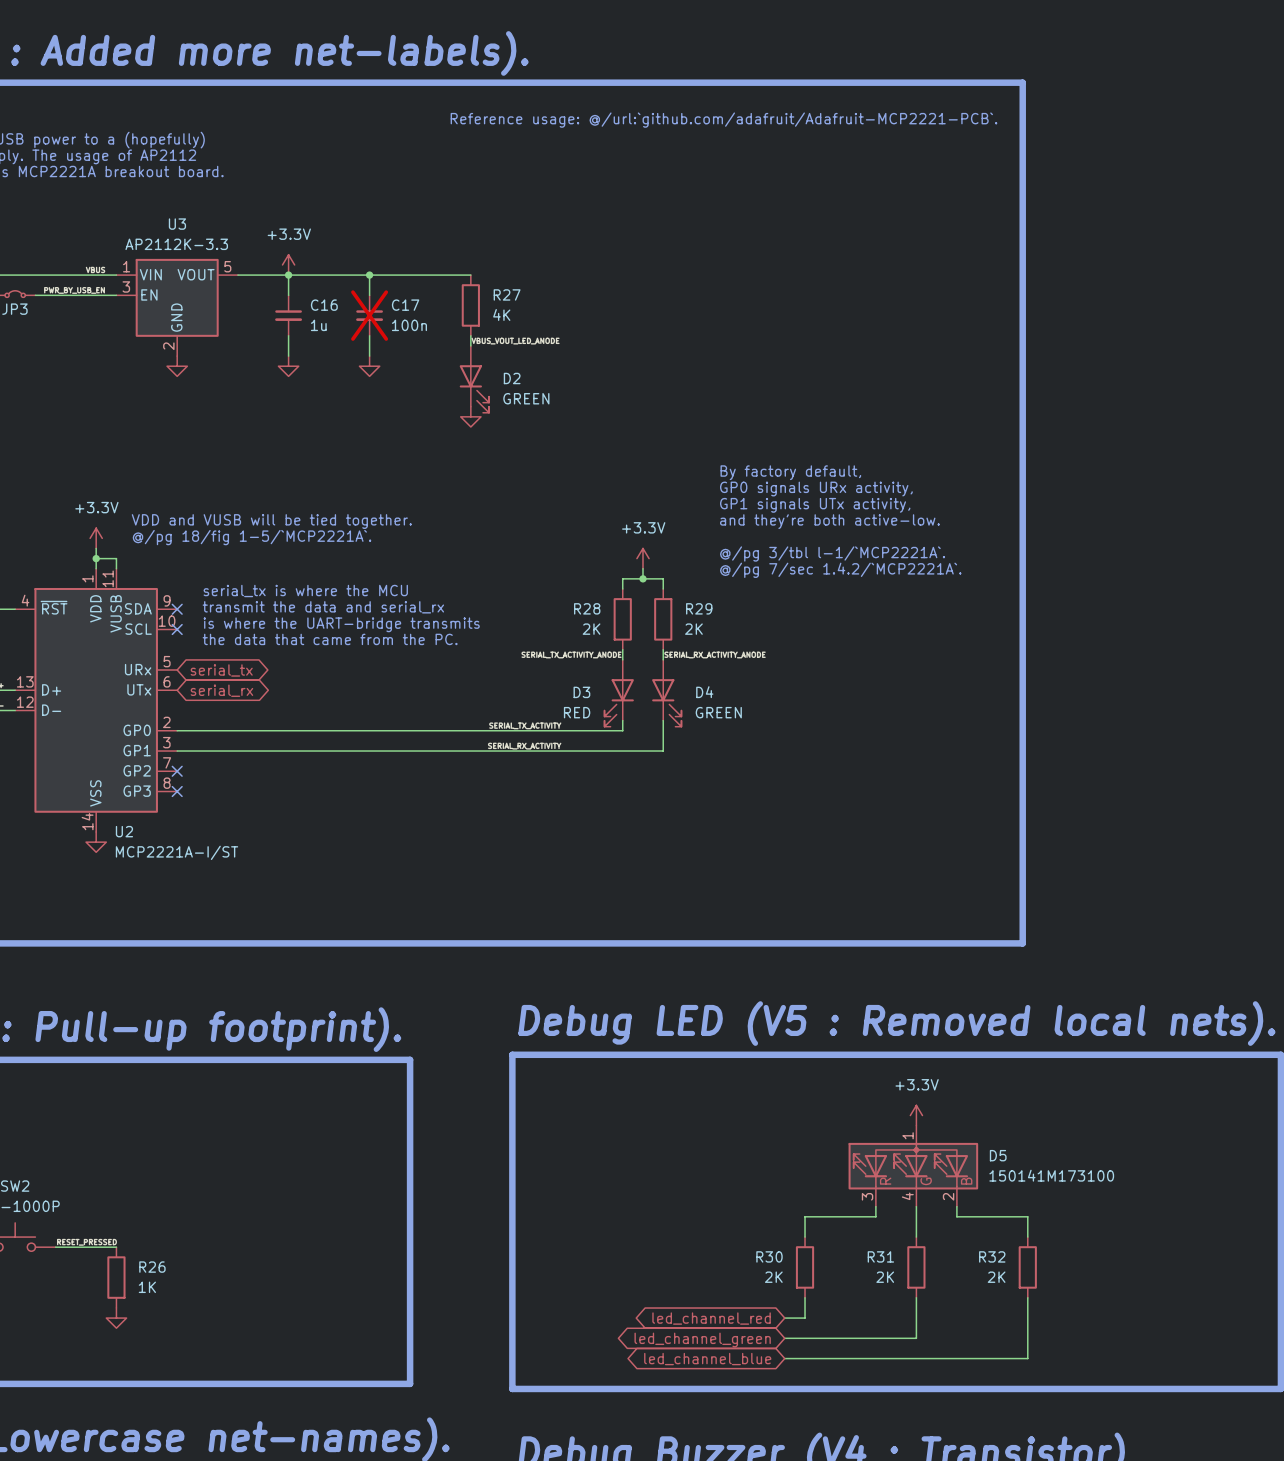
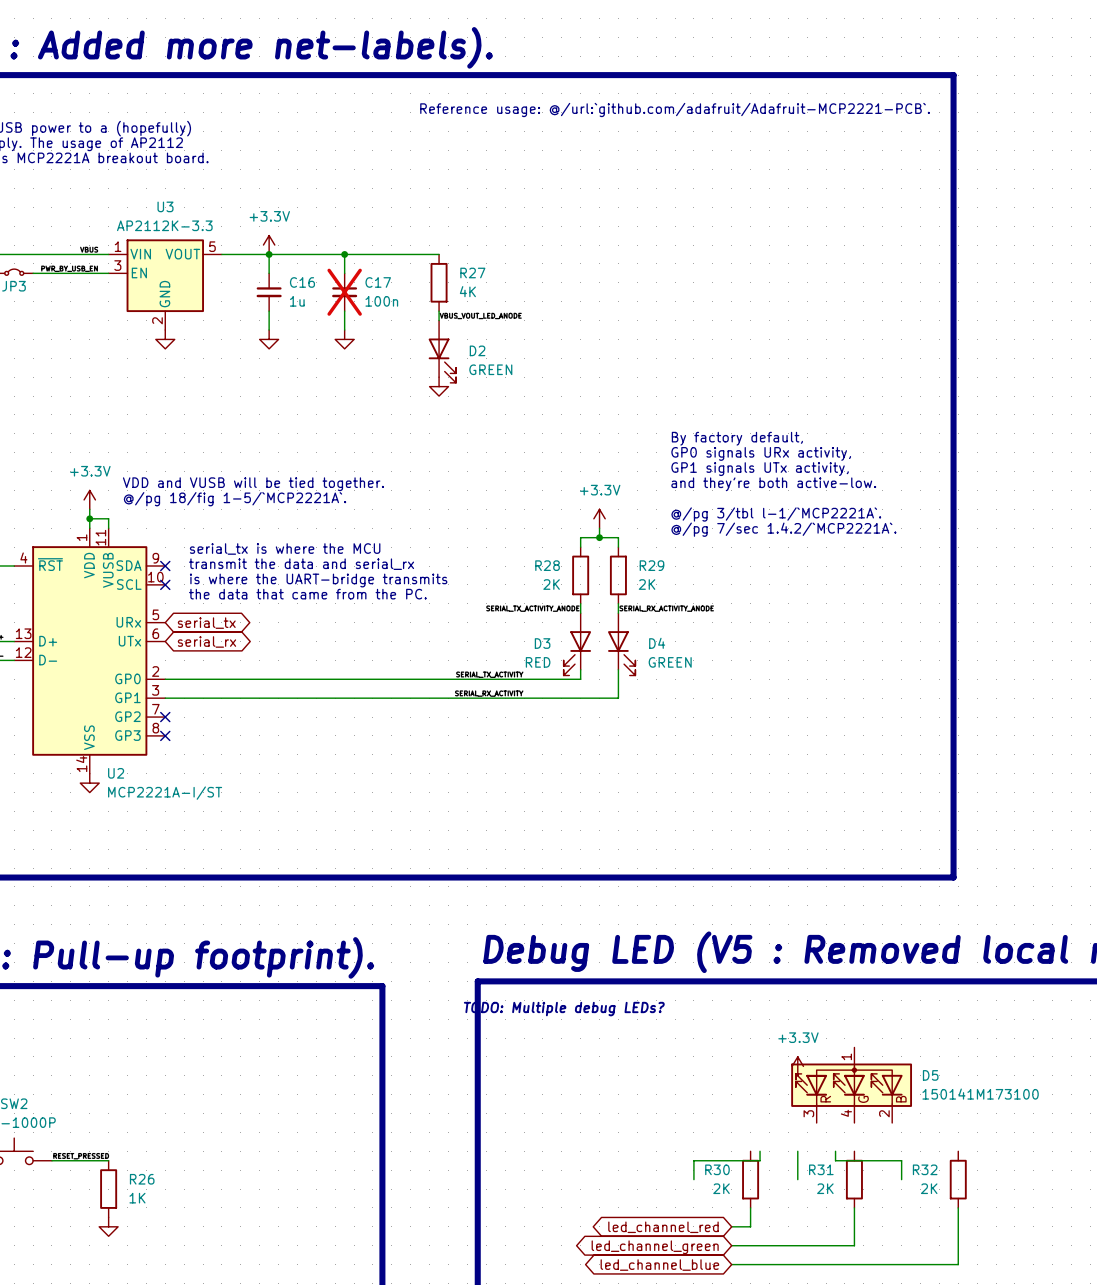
text: none -> TODO: Multiple debug LEDs? (564, 1009)
power symbol position: +3.3V (916, 1115) -> +3.3V (797, 1066)
wire: (875, 1206) (875, 1216) (805, 1216) (805, 1237) -> (760, 1151) (760, 1160) (693, 1160) (693, 1179)
wire: (916, 1206) (916, 1237) -> (797, 1151) (797, 1179)
wire: (956, 1206) (956, 1216) (1027, 1216) (1027, 1237) -> (835, 1151) (835, 1160) (901, 1160) (901, 1179)

